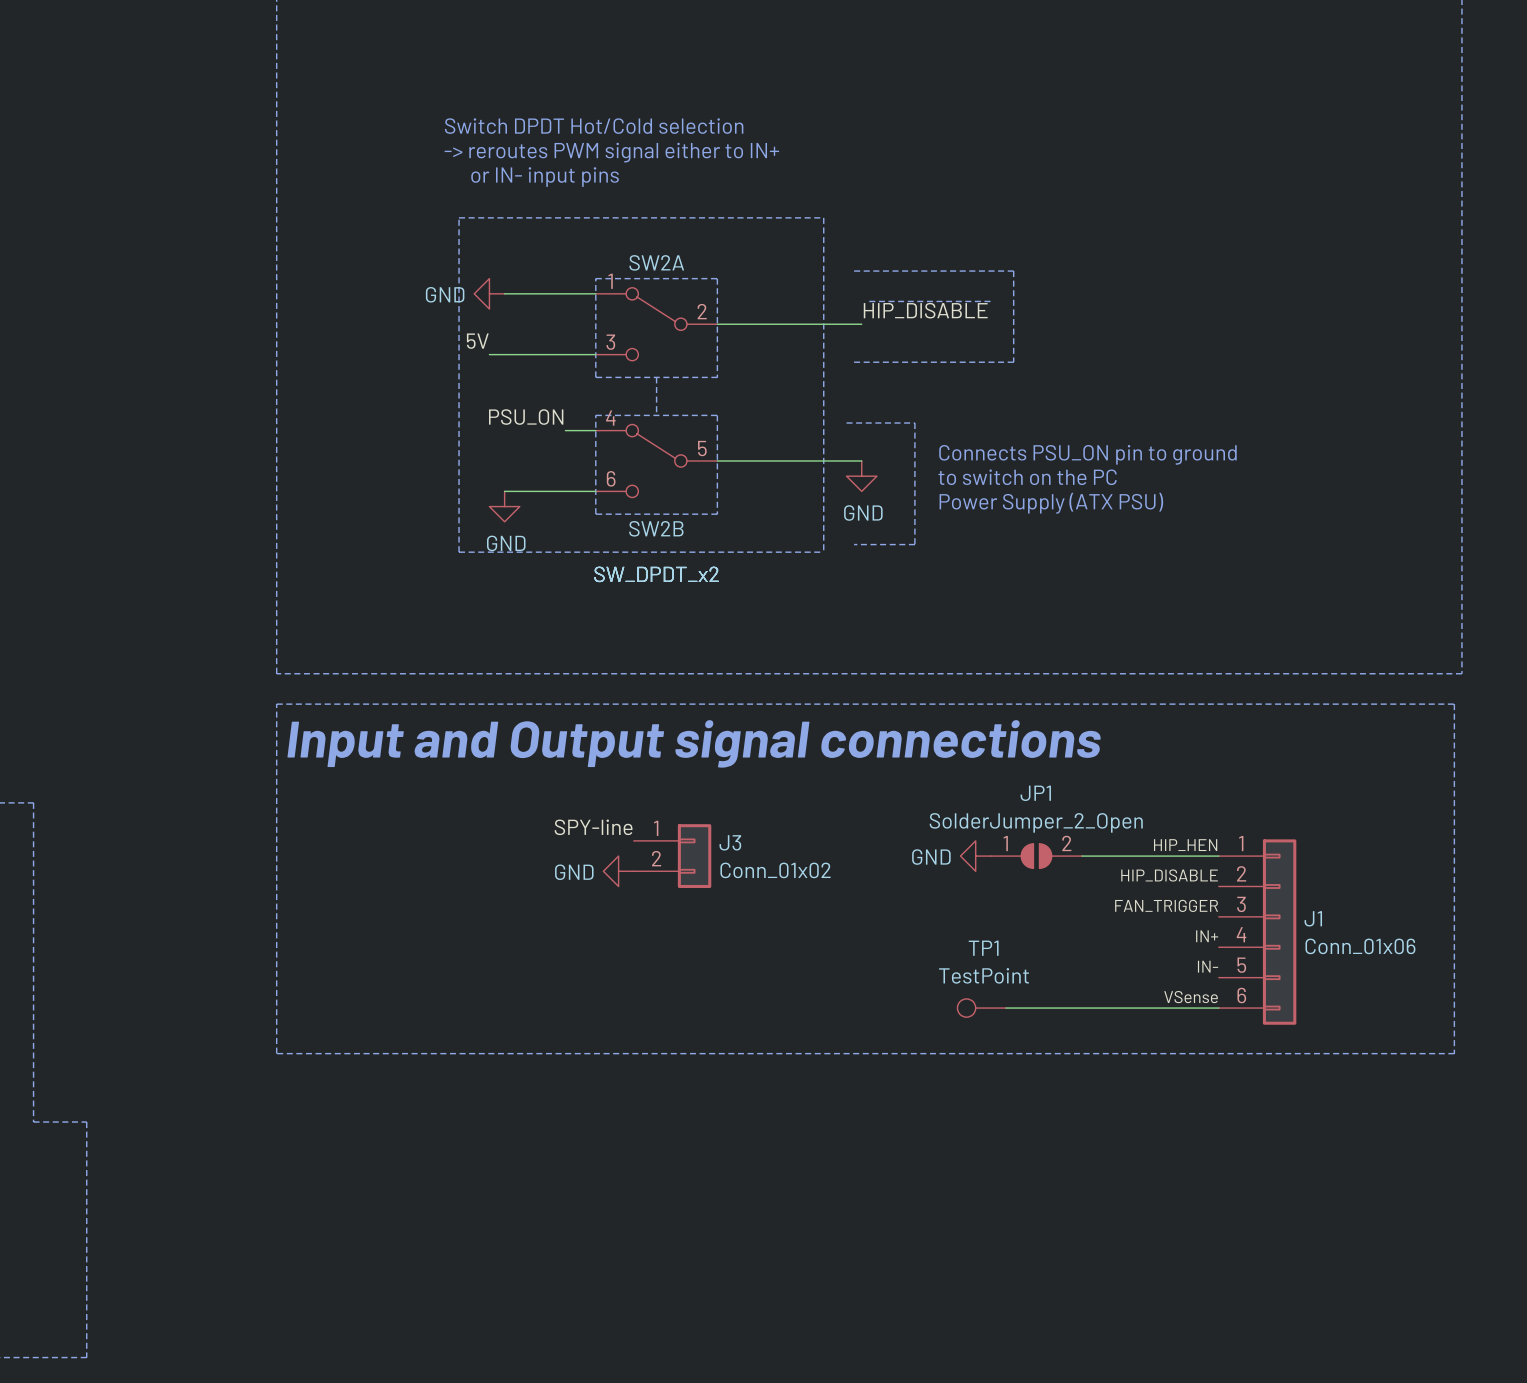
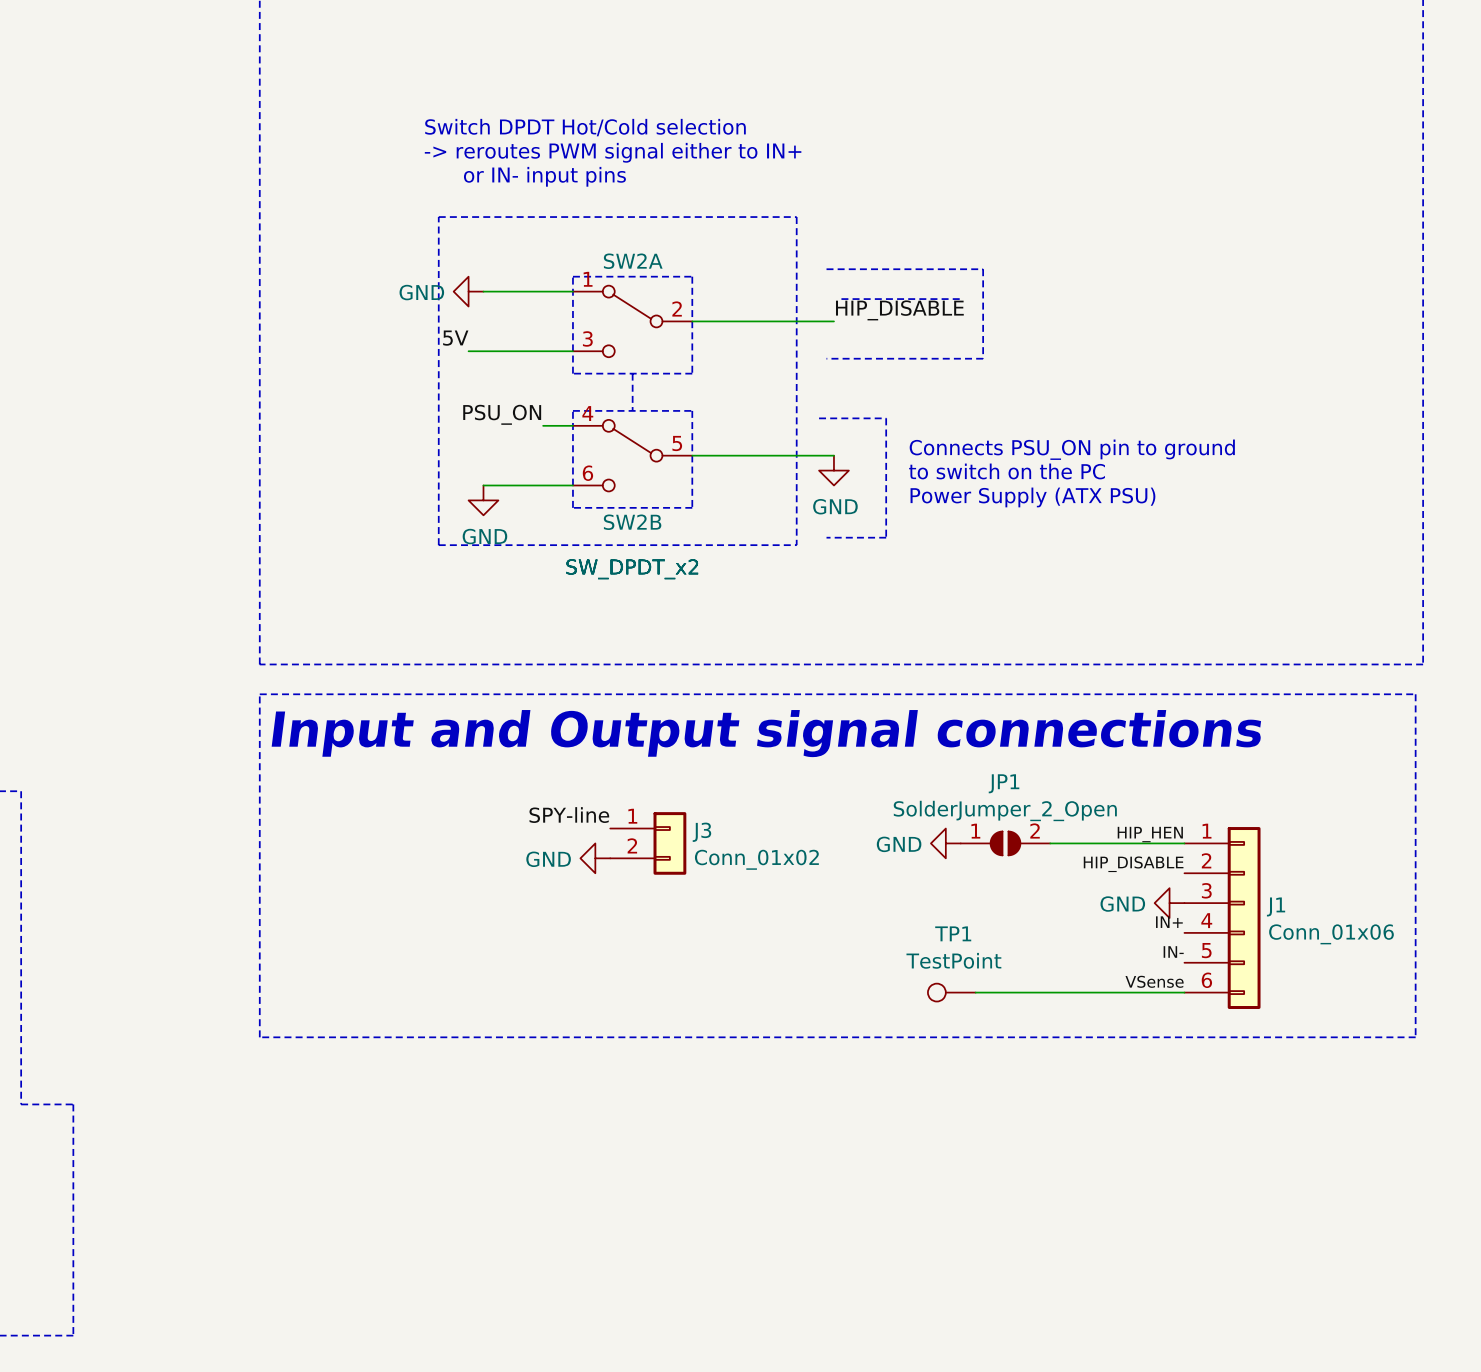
label: FAN_TRIGGER (1166, 905) -> none
power symbol: none -> GND (1169, 903)

